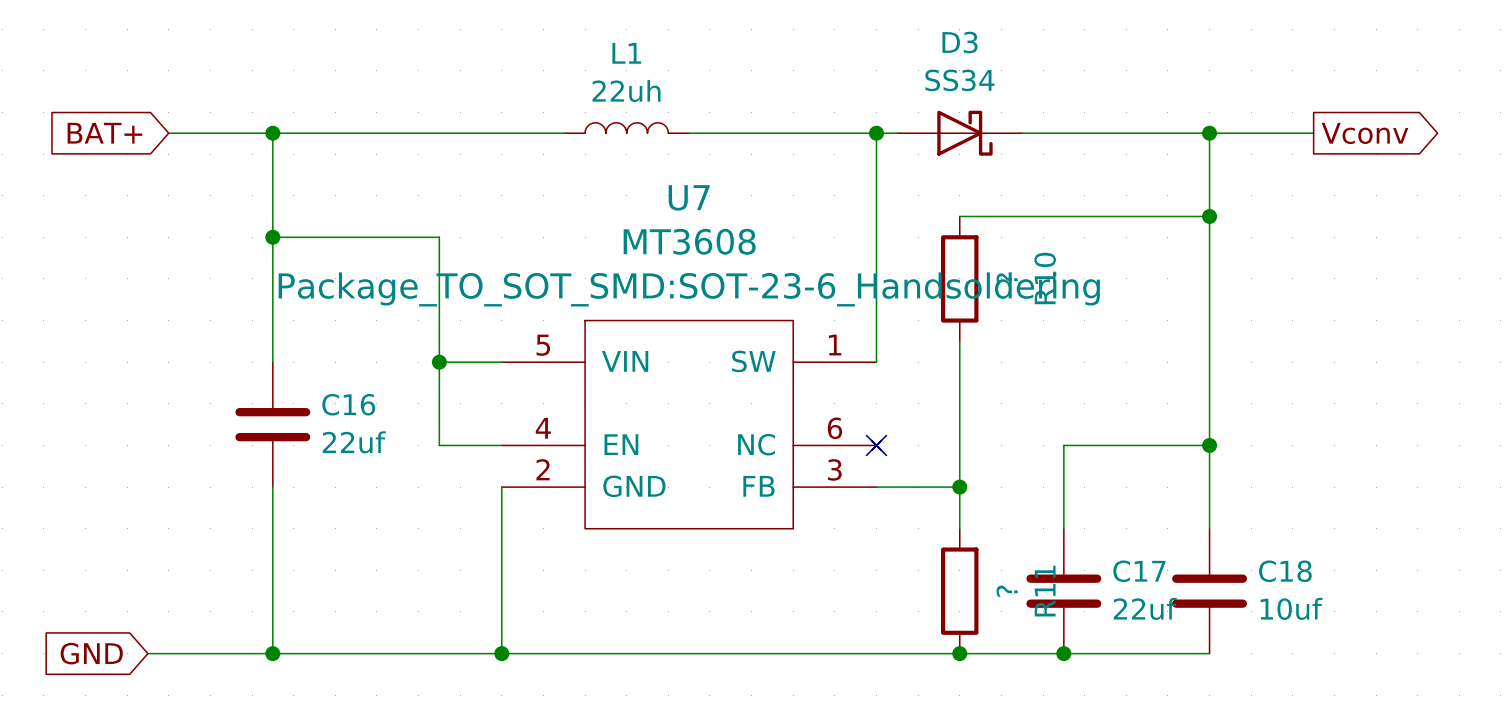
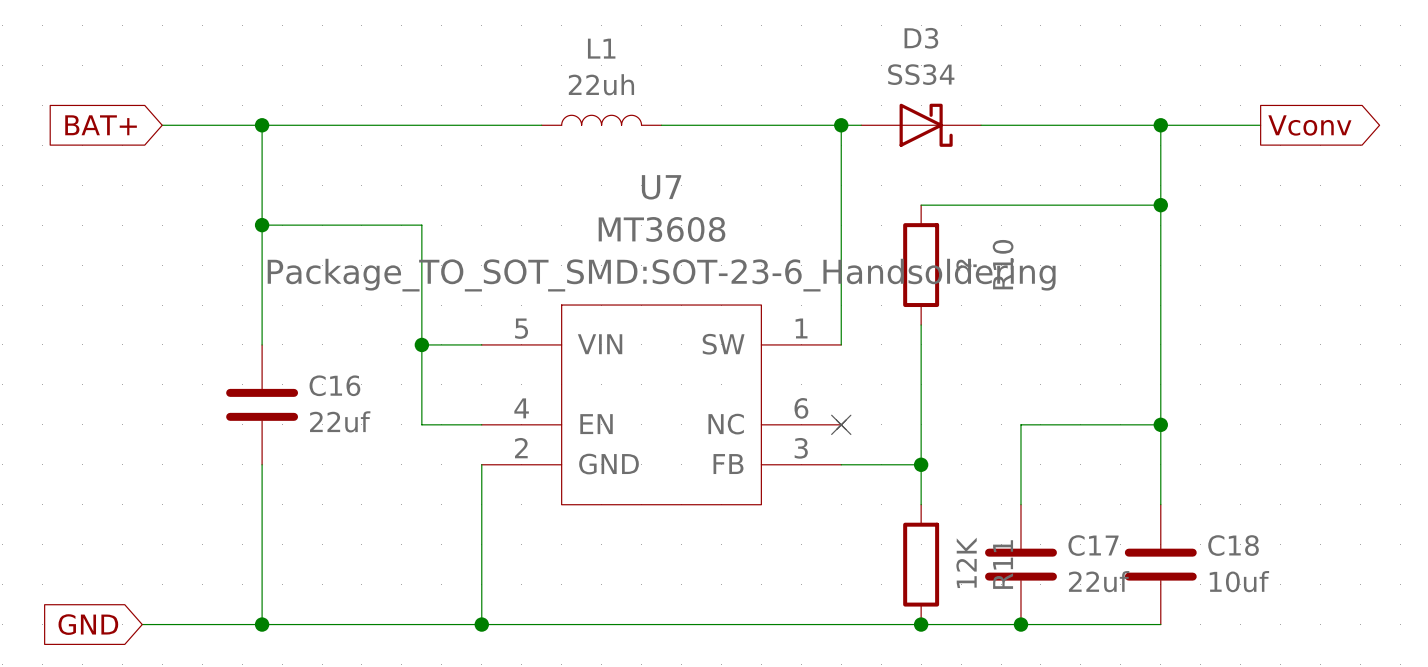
R11 value: ? (1007, 591) -> 12K (966, 562)

